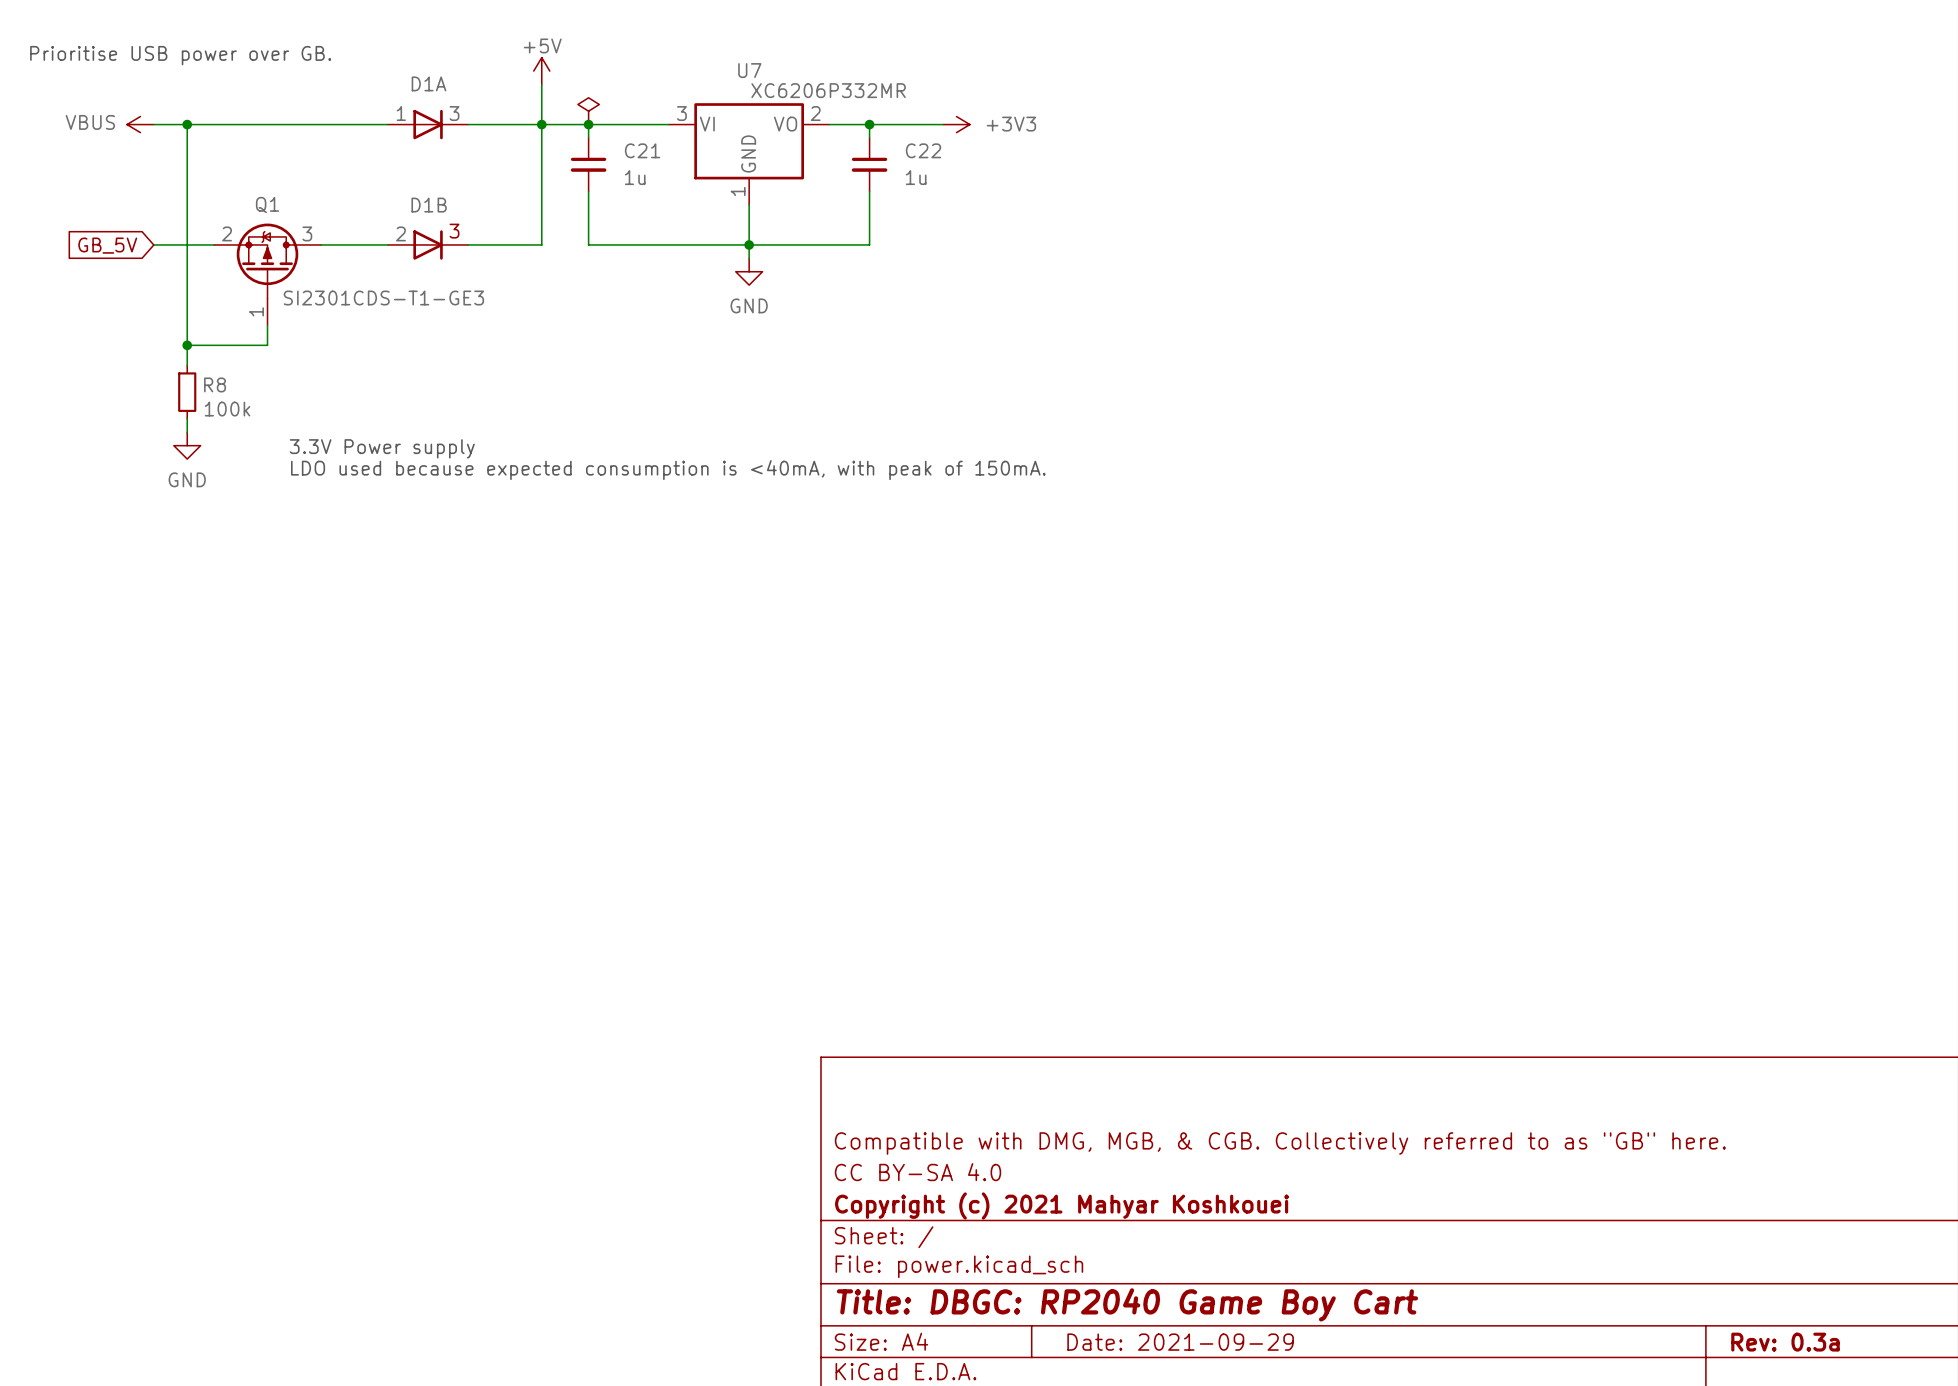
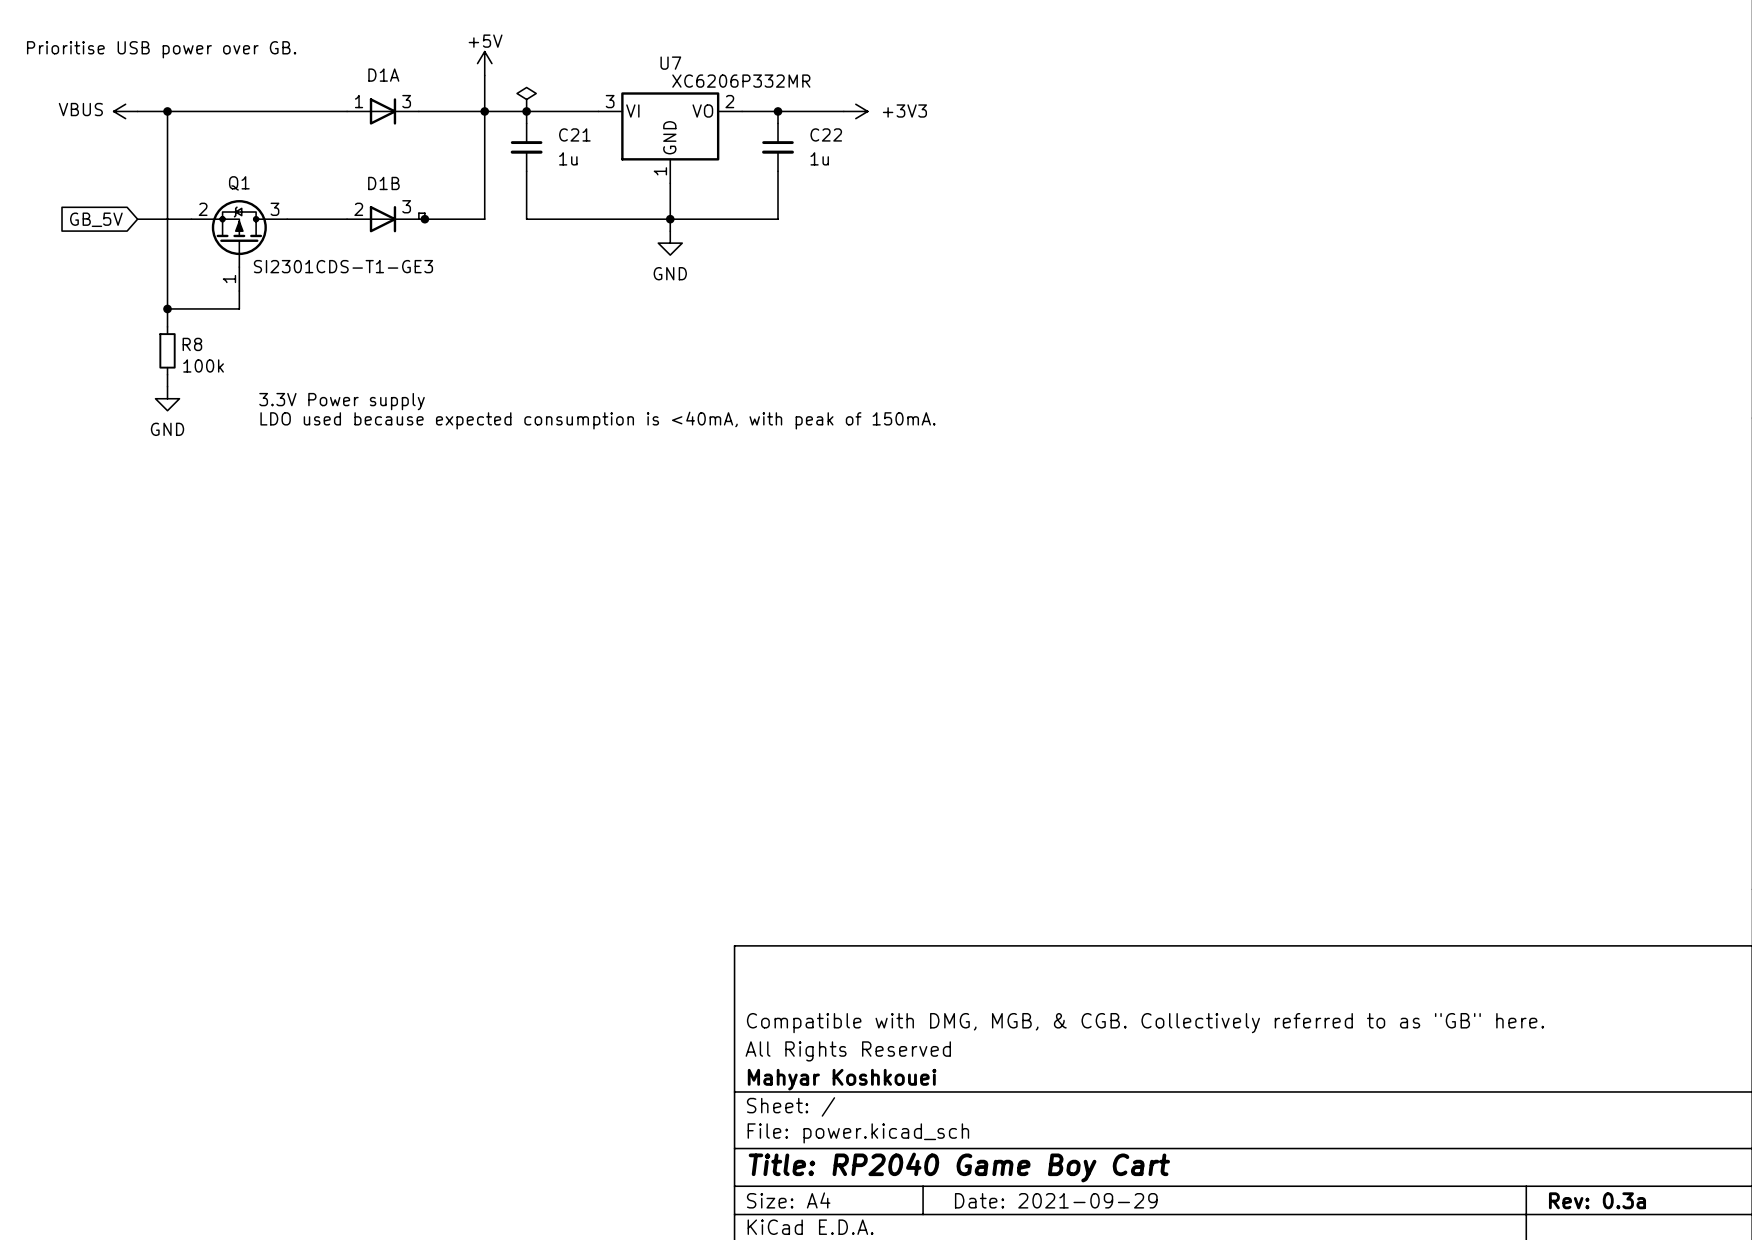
wire: none -> (418, 219) (418, 213) (424, 213) (424, 219)
junction: none -> (424, 219)
title block: CC BY-SA 4.0 (917, 1172) -> All Rights Reserved (848, 1051)
title block: Copyright (c) 2021 Mahyar Koshkouei (1061, 1205) -> Mahyar Koshkouei (842, 1079)
title block: Title: DBGC: RP2040 Game Boy Cart (1127, 1304) -> Title: RP2040 Game Boy Cart (959, 1167)

